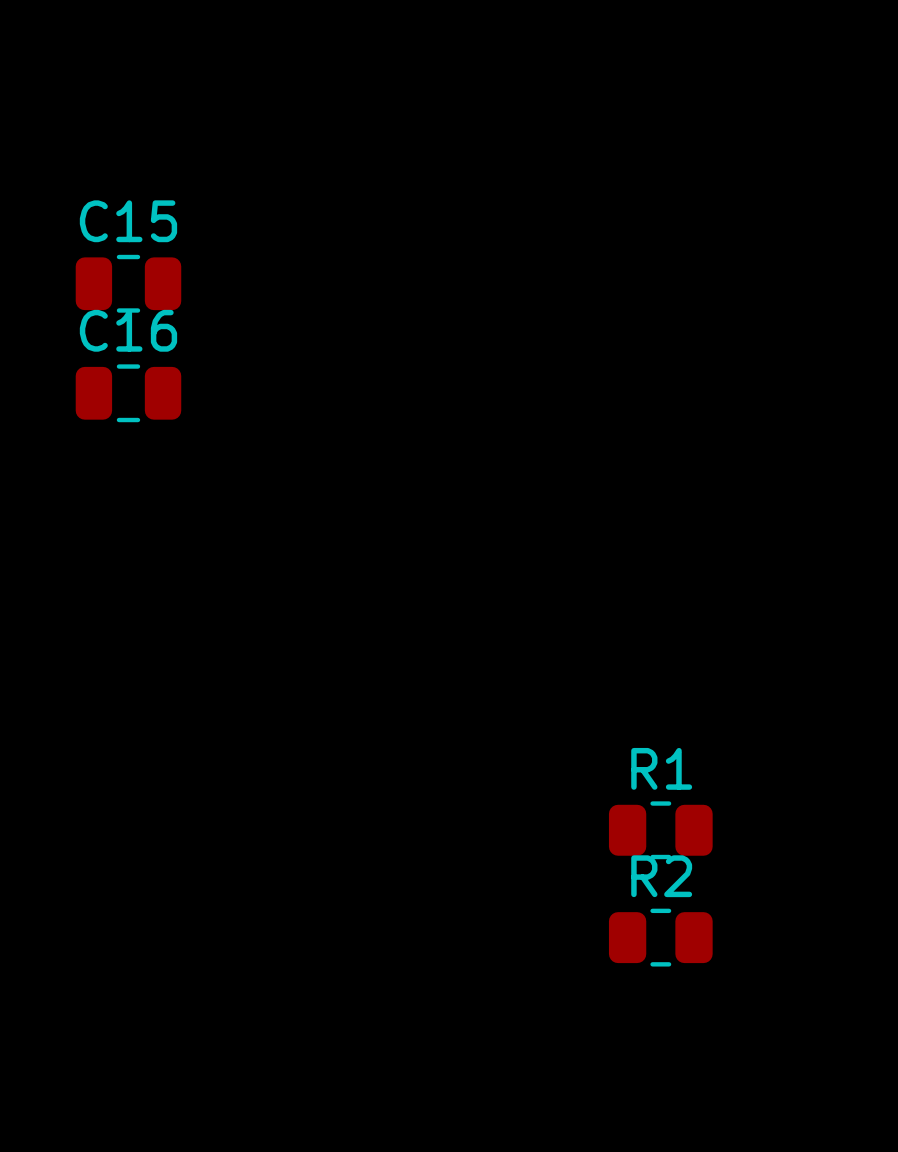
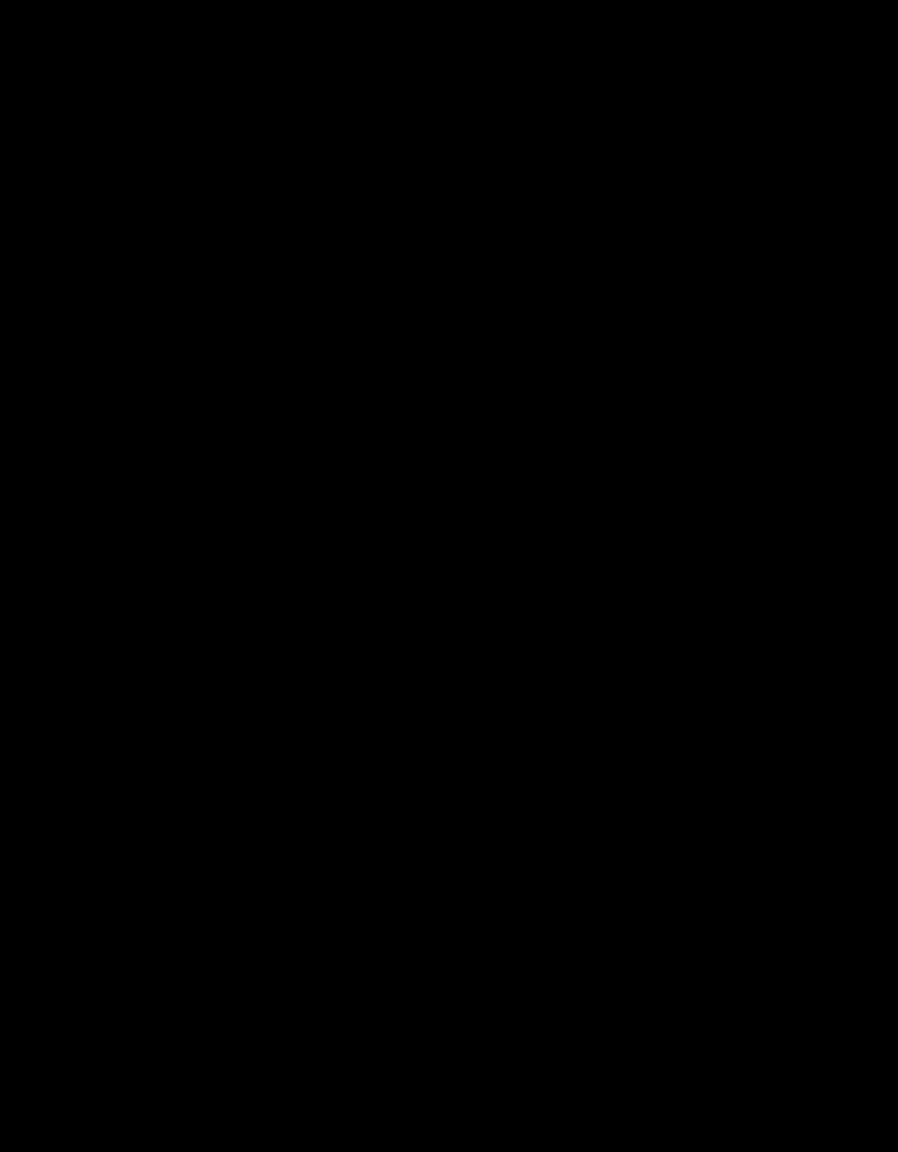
C15: (128, 283) -> none
C16: (128, 393) -> none
R1: (660, 830) -> none
R2: (660, 937) -> none

